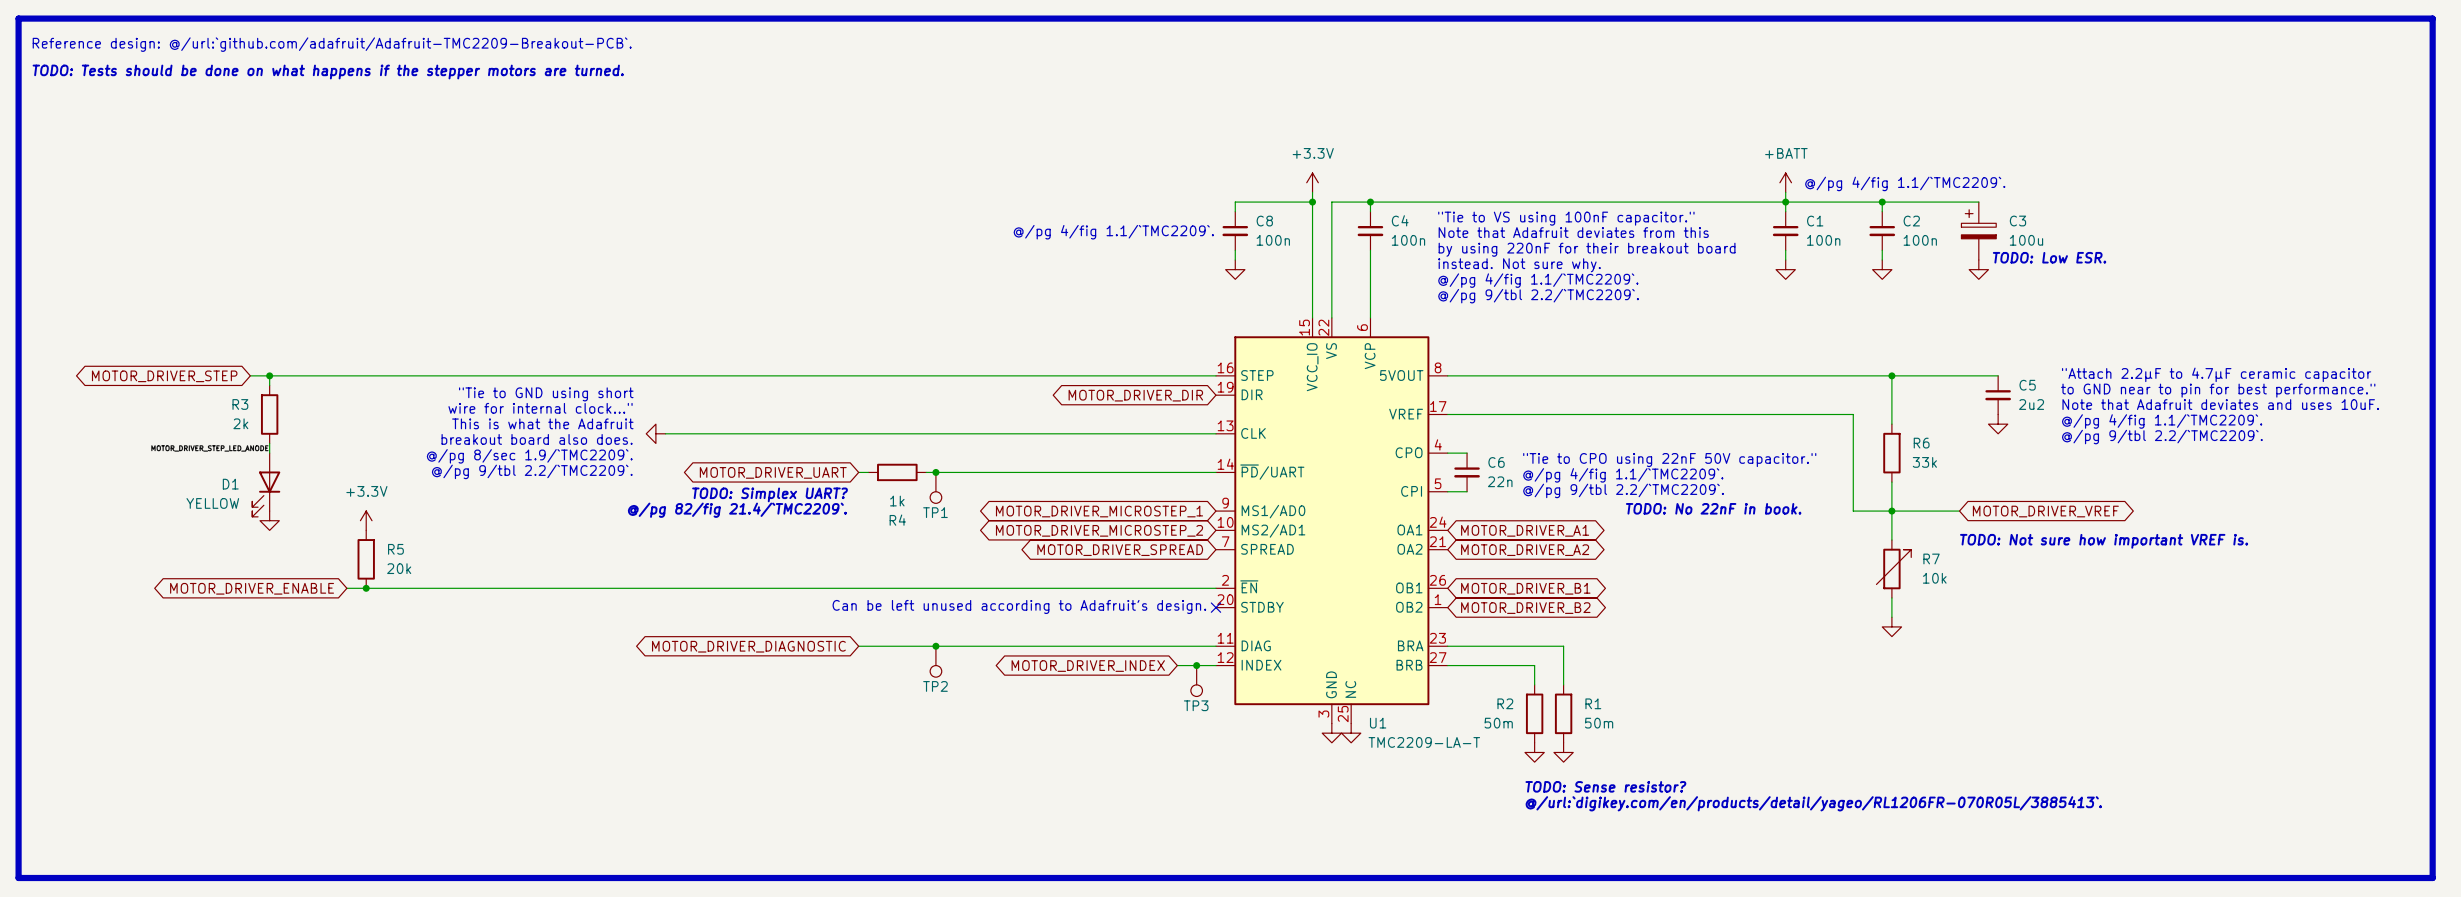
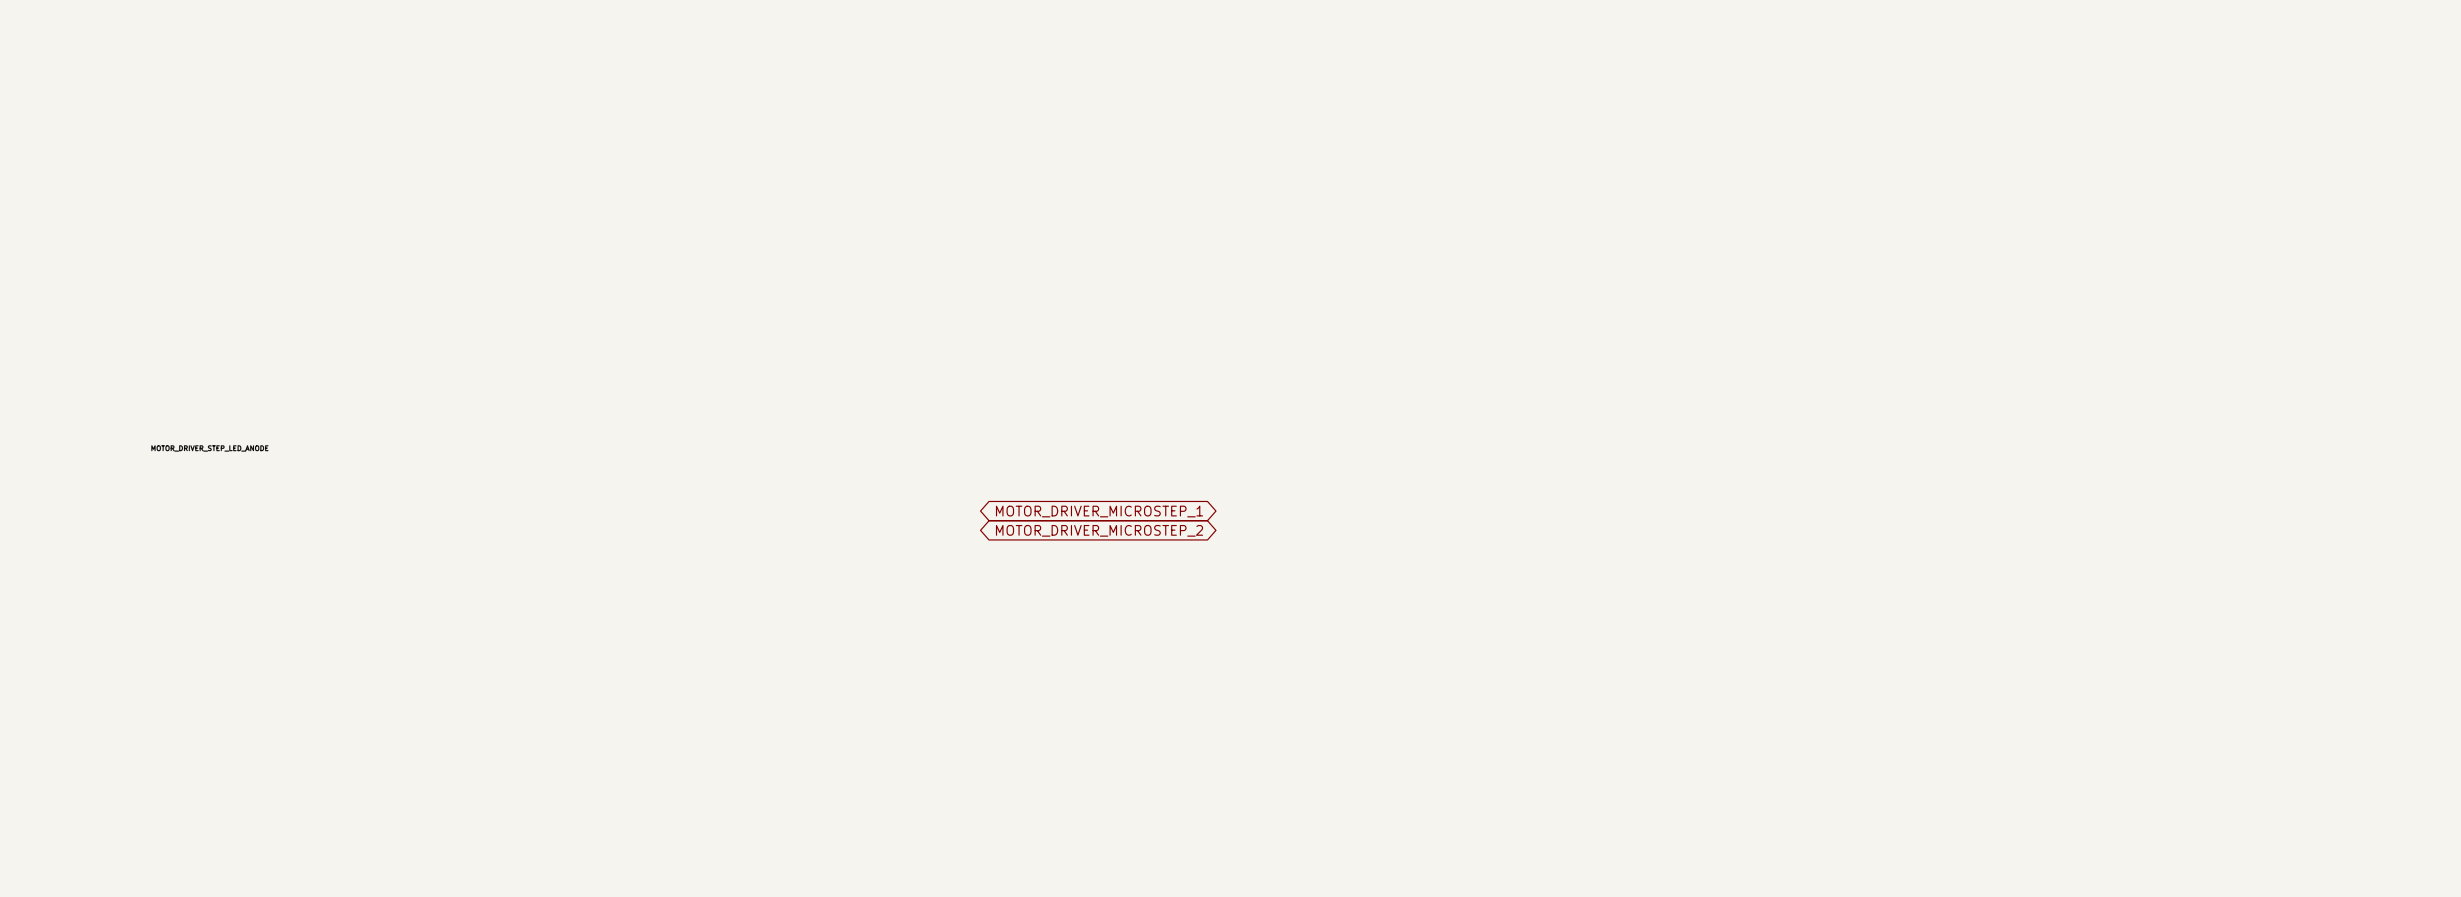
line: (18, 18) (2432, 18) (2432, 878) (18, 878) (18, 18) -> none
text: Reference design: @/url:`github.com/adafruit/Adafruit-TMC2209-Breakout-PCB`. (332, 44) -> none
text: TODO: Tests should be done on what happens if the stepper motors are turned. (328, 72) -> none
power symbol: +3.3V (1312, 182) -> none
power symbol: +BATT (1785, 182) -> none
text: @/pg 4/fig 1.1/`TMC2209`. (1905, 183) -> none
wire: (1312, 192) (1312, 317) -> none
wire: (1785, 192) (1785, 211) -> none
wire: (1312, 202) (1235, 202) (1235, 211) -> none
junction: (1312, 202) -> none
wire: (1370, 202) (1370, 211) -> none
junction: (1370, 202) -> none
junction: (1785, 202) -> none
wire: (1882, 202) (1882, 211) -> none
junction: (1882, 202) -> none
wire: (1978, 202) (1331, 202) (1331, 317) -> none
text: "Tie to VS using 100nF capacitor." (1566, 218) -> none
C8: 100n (1235, 231) -> none
C4: 100n (1370, 231) -> none
C1: 100n (1785, 231) -> none
C2: 100n (1882, 231) -> none
C3: 100u (1978, 231) -> none
text: @/pg 4/fig 1.1/`TMC2209`. (1113, 232) -> none
text: Note that Adafruit deviates from this (1573, 232) -> none
text: by using 220nF for their breakout board (1587, 249) -> none
wire: (1235, 250) (1235, 259) -> none
wire: (1370, 250) (1370, 317) -> none
wire: (1785, 250) (1785, 259) -> none
wire: (1882, 250) (1882, 259) -> none
text: TODO: Low ESR. (2049, 257) -> none
text: instead. Not sure why. (1519, 265) -> none
power symbol: (1235, 269) -> none
power symbol: (1785, 269) -> none
power symbol: (1882, 269) -> none
power symbol: (1978, 269) -> none
text: @/pg 4/fig 1.1/`TMC2209`. (1538, 280) -> none
text: @/pg 9/tbl 2.2/`TMC2209`. (1538, 296) -> none
text: "Attach 2.2μF to 4.7μF ceramic capacitor (2216, 374) -> none
wire: (250, 375) (1215, 375) -> none
wire: (269, 375) (269, 385) -> none
junction: (269, 375) -> none
wire: (1447, 375) (1998, 375) -> none
wire: (1891, 375) (1891, 424) -> none
junction: (1891, 375) -> none
global label: MOTOR_DRIVER_STEP (164, 376) -> none
text: to GND near to pin for best performance." (2218, 390) -> none
text: "Tie to GND using short (546, 394) -> none
global label: MOTOR_DRIVER_DIR (1135, 395) -> none
C5: 2u2 (1998, 395) -> none
text: Note that Adafruit deviates and uses 10uF. (2220, 404) -> none
text: wire for internal clock..." (540, 408) -> none
R3: 2k (269, 414) -> none
wire: (1447, 414) (1853, 414) (1853, 511) (1959, 511) -> none
text: @/pg 4/fig 1.1/`TMC2209`. (2162, 421) -> none
text: This is what the Adafruit (542, 423) -> none
power symbol: (1998, 424) -> none
power symbol: (655, 433) -> none
wire: (665, 433) (1215, 433) -> none
text: @/pg 9/tbl 2.2/`TMC2209`. (2162, 437) -> none
text: breakout board also does. (537, 439) -> none
wire: (269, 443) (269, 453) -> none
wire: (1447, 453) (1467, 453) -> none
R6: 33k (1891, 453) -> none
text: @/pg 8/sec 1.9/`TMC2209`. (529, 456) -> none
text: "Tie to CPO using 22nF 50V capacitor." (1669, 460) -> none
text: @/pg 9/tbl 2.2/`TMC2209`. (532, 471) -> none
global label: MOTOR_DRIVER_UART (773, 472) -> none
wire: (858, 472) (868, 472) -> none
R4: 1k (897, 472) -> none
wire: (926, 472) (1215, 472) -> none
junction: (935, 472) -> none
C6: 22n (1467, 472) -> none
text: @/pg 4/fig 1.1/`TMC2209`. (1623, 475) -> none
wire: (1891, 482) (1891, 540) -> none
D1: YELLOW (266, 484) -> none
TP1: (935, 487) -> none
text: @/pg 9/tbl 2.2/`TMC2209`. (1623, 490) -> none
wire: (1447, 491) (1467, 491) -> none
text: TODO: Simplex UART? (770, 494) -> none
text: TODO: No 22nF in book. (1713, 508) -> none
text: @/pg 82/fig 21.4/`TMC2209`. (737, 510) -> none
junction: (1891, 511) -> none
global label: MOTOR_DRIVER_VREF (2045, 511) -> none
power symbol: (269, 520) -> none
power symbol: +3.3V (366, 520) -> none
U1: TMC2209-LA-T (1331, 520) -> none
global label: MOTOR_DRIVER_A1 (1525, 530) -> none
text: TODO: Not sure how important VREF is. (2104, 541) -> none
global label: MOTOR_DRIVER_SPREAD (1120, 550) -> none
global label: MOTOR_DRIVER_A2 (1525, 550) -> none
R5: 20k (366, 559) -> none
R7: 10k (1893, 569) -> none
global label: MOTOR_DRIVER_ENABLE (252, 588) -> none
wire: (346, 588) (1215, 588) -> none
junction: (366, 588) -> none
global label: MOTOR_DRIVER_B1 (1525, 588) -> none
wire: (1891, 597) (1891, 617) -> none
text: Can be left unused according to Adafruit's design. (1019, 606) -> none
no-connect mark: (1215, 607) -> none
global label: MOTOR_DRIVER_B2 (1525, 608) -> none
power symbol: (1891, 626) -> none
global label: MOTOR_DRIVER_DIAGNOSTIC (748, 646) -> none
wire: (858, 646) (1215, 646) -> none
junction: (935, 646) -> none
wire: (1447, 646) (1563, 646) (1563, 684) -> none
TP2: (935, 661) -> none
wire: (1177, 665) (1215, 665) -> none
junction: (1196, 665) -> none
wire: (1447, 665) (1534, 665) (1534, 684) -> none
global label: MOTOR_DRIVER_INDEX (1088, 666) -> none
TP3: (1196, 681) -> none
R2: 50m (1534, 713) -> none
R1: 50m (1563, 713) -> none
power symbol: (1331, 733) -> none
power symbol: (1351, 733) -> none
power symbol: (1534, 752) -> none
power symbol: (1563, 752) -> none
text: TODO: Sense resistor? (1605, 786) -> none
text: @/url:`digikey.com/en/products/detail/yageo/RL1206FR-070R05L/3885413`. (1813, 803) -> none

